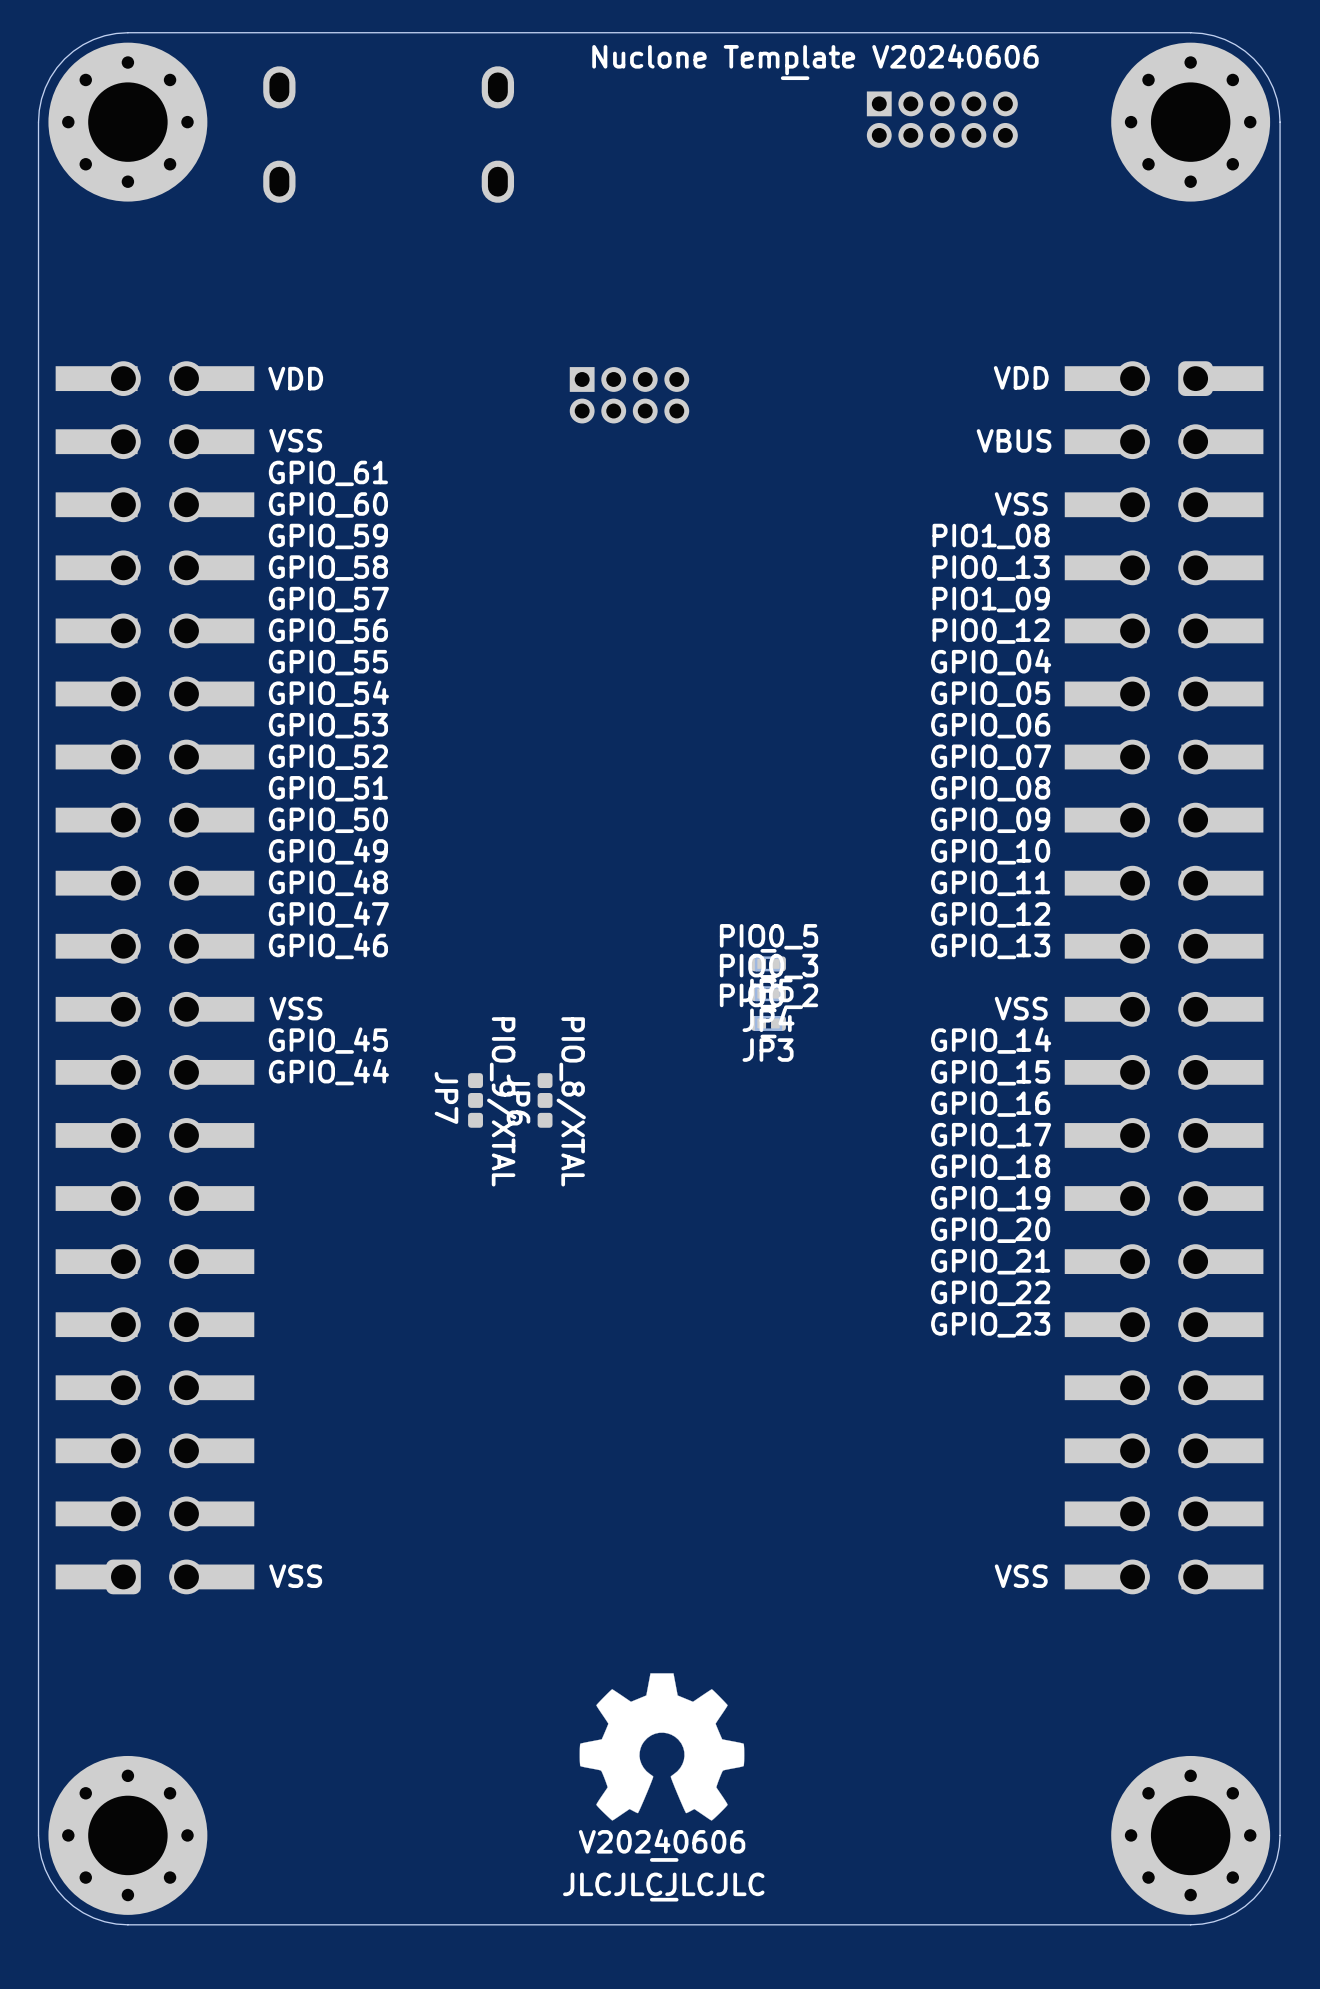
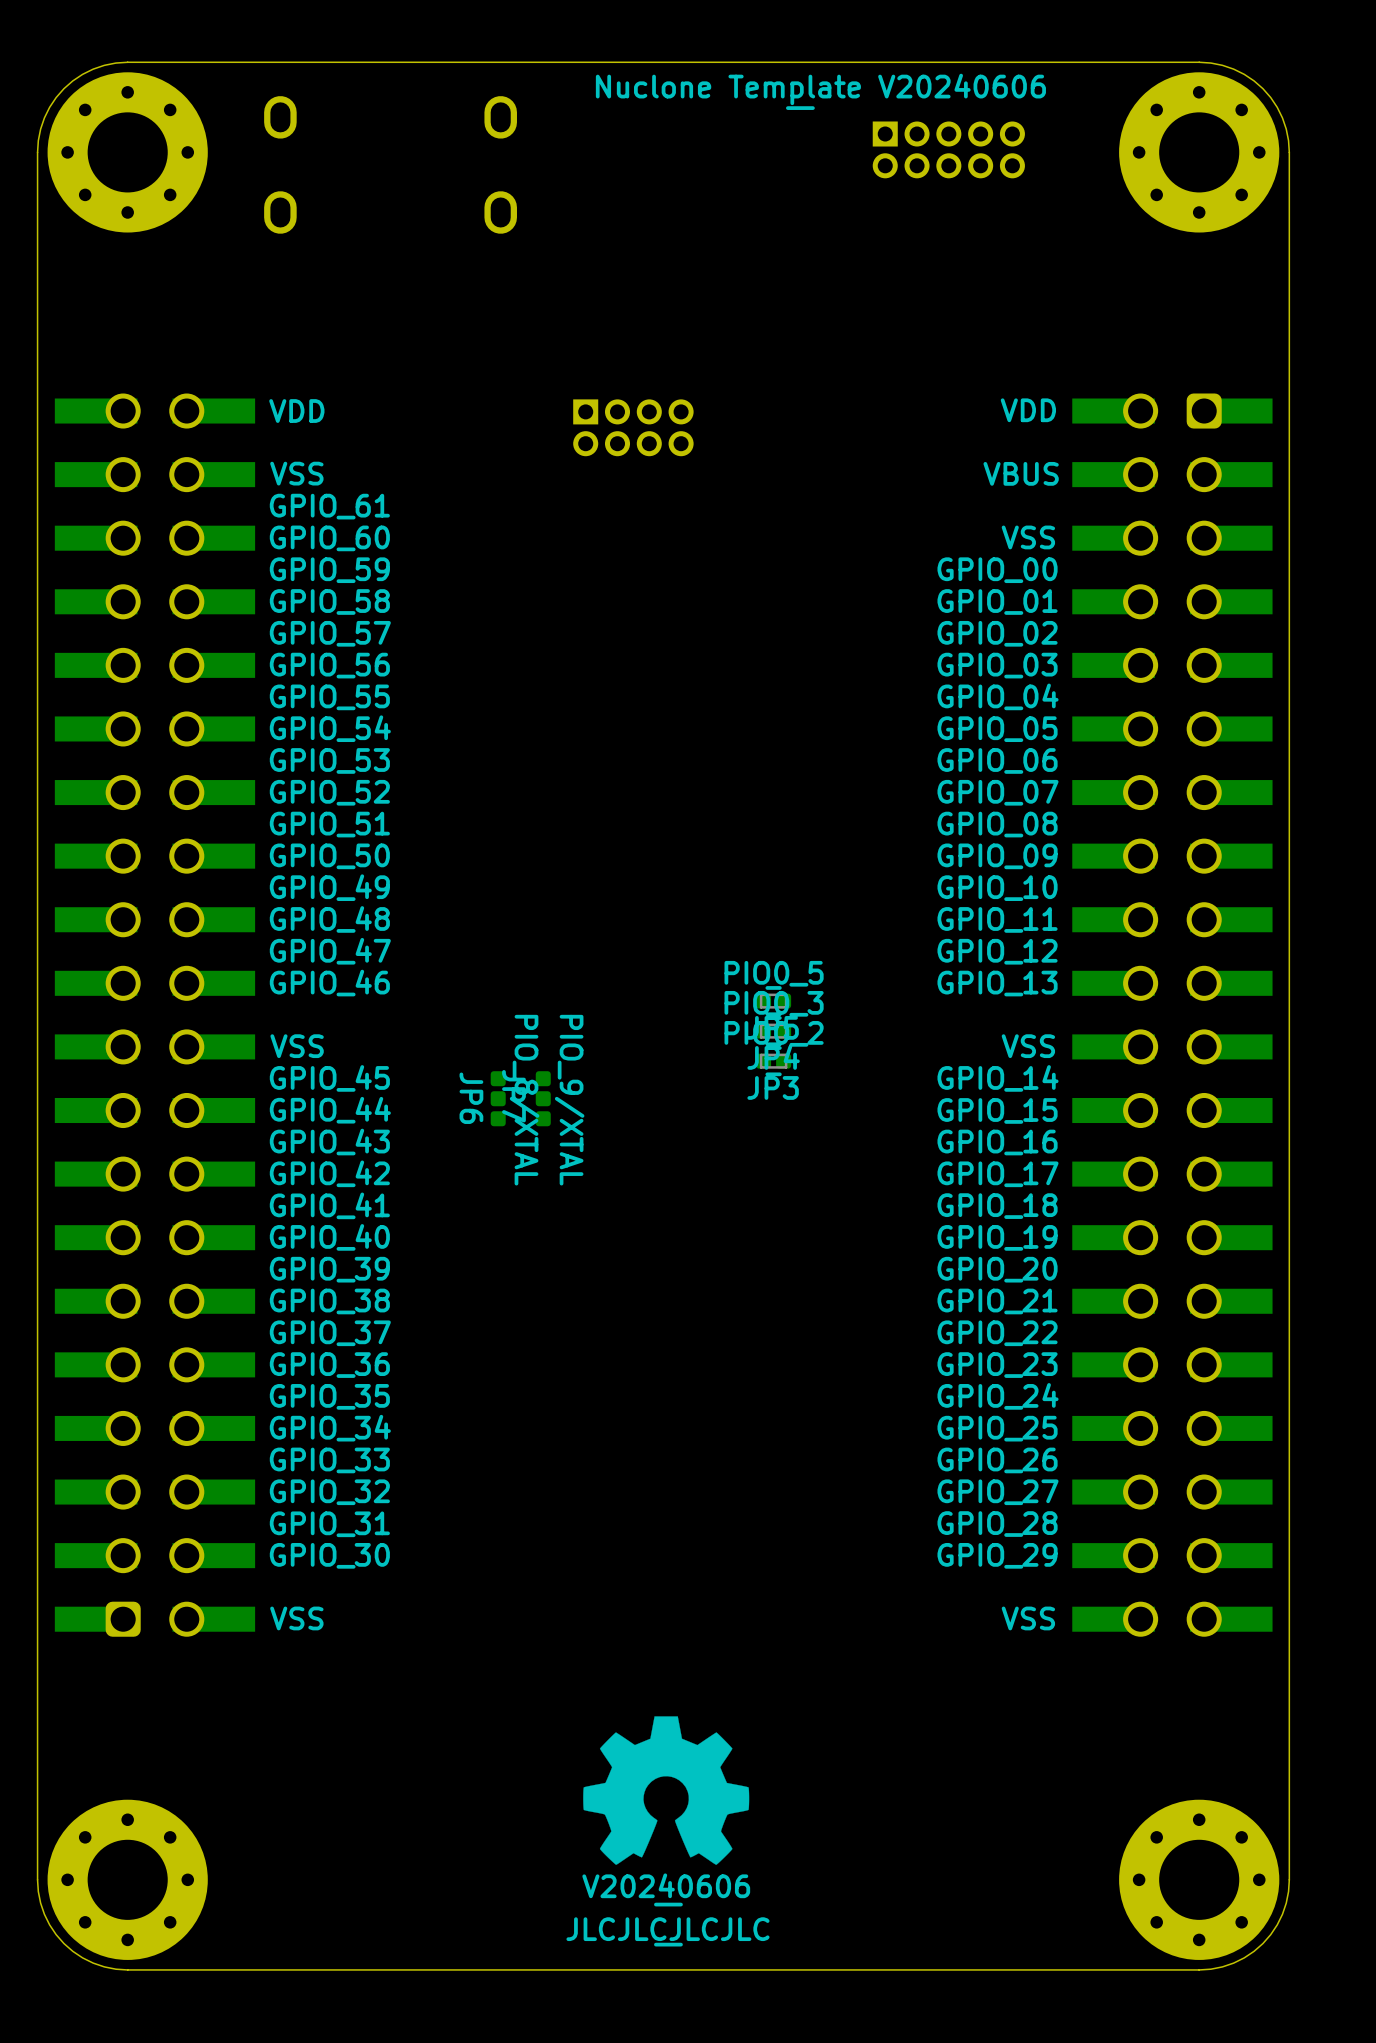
part footprint: [55, 361, 255, 1595] -> [54, 393, 256, 1637]
part footprint: [1064, 361, 1264, 1595] -> [1072, 393, 1273, 1637]
JP7 position: (475, 1100) -> (543, 1098)
JP6 position: (545, 1100) -> (498, 1098)

